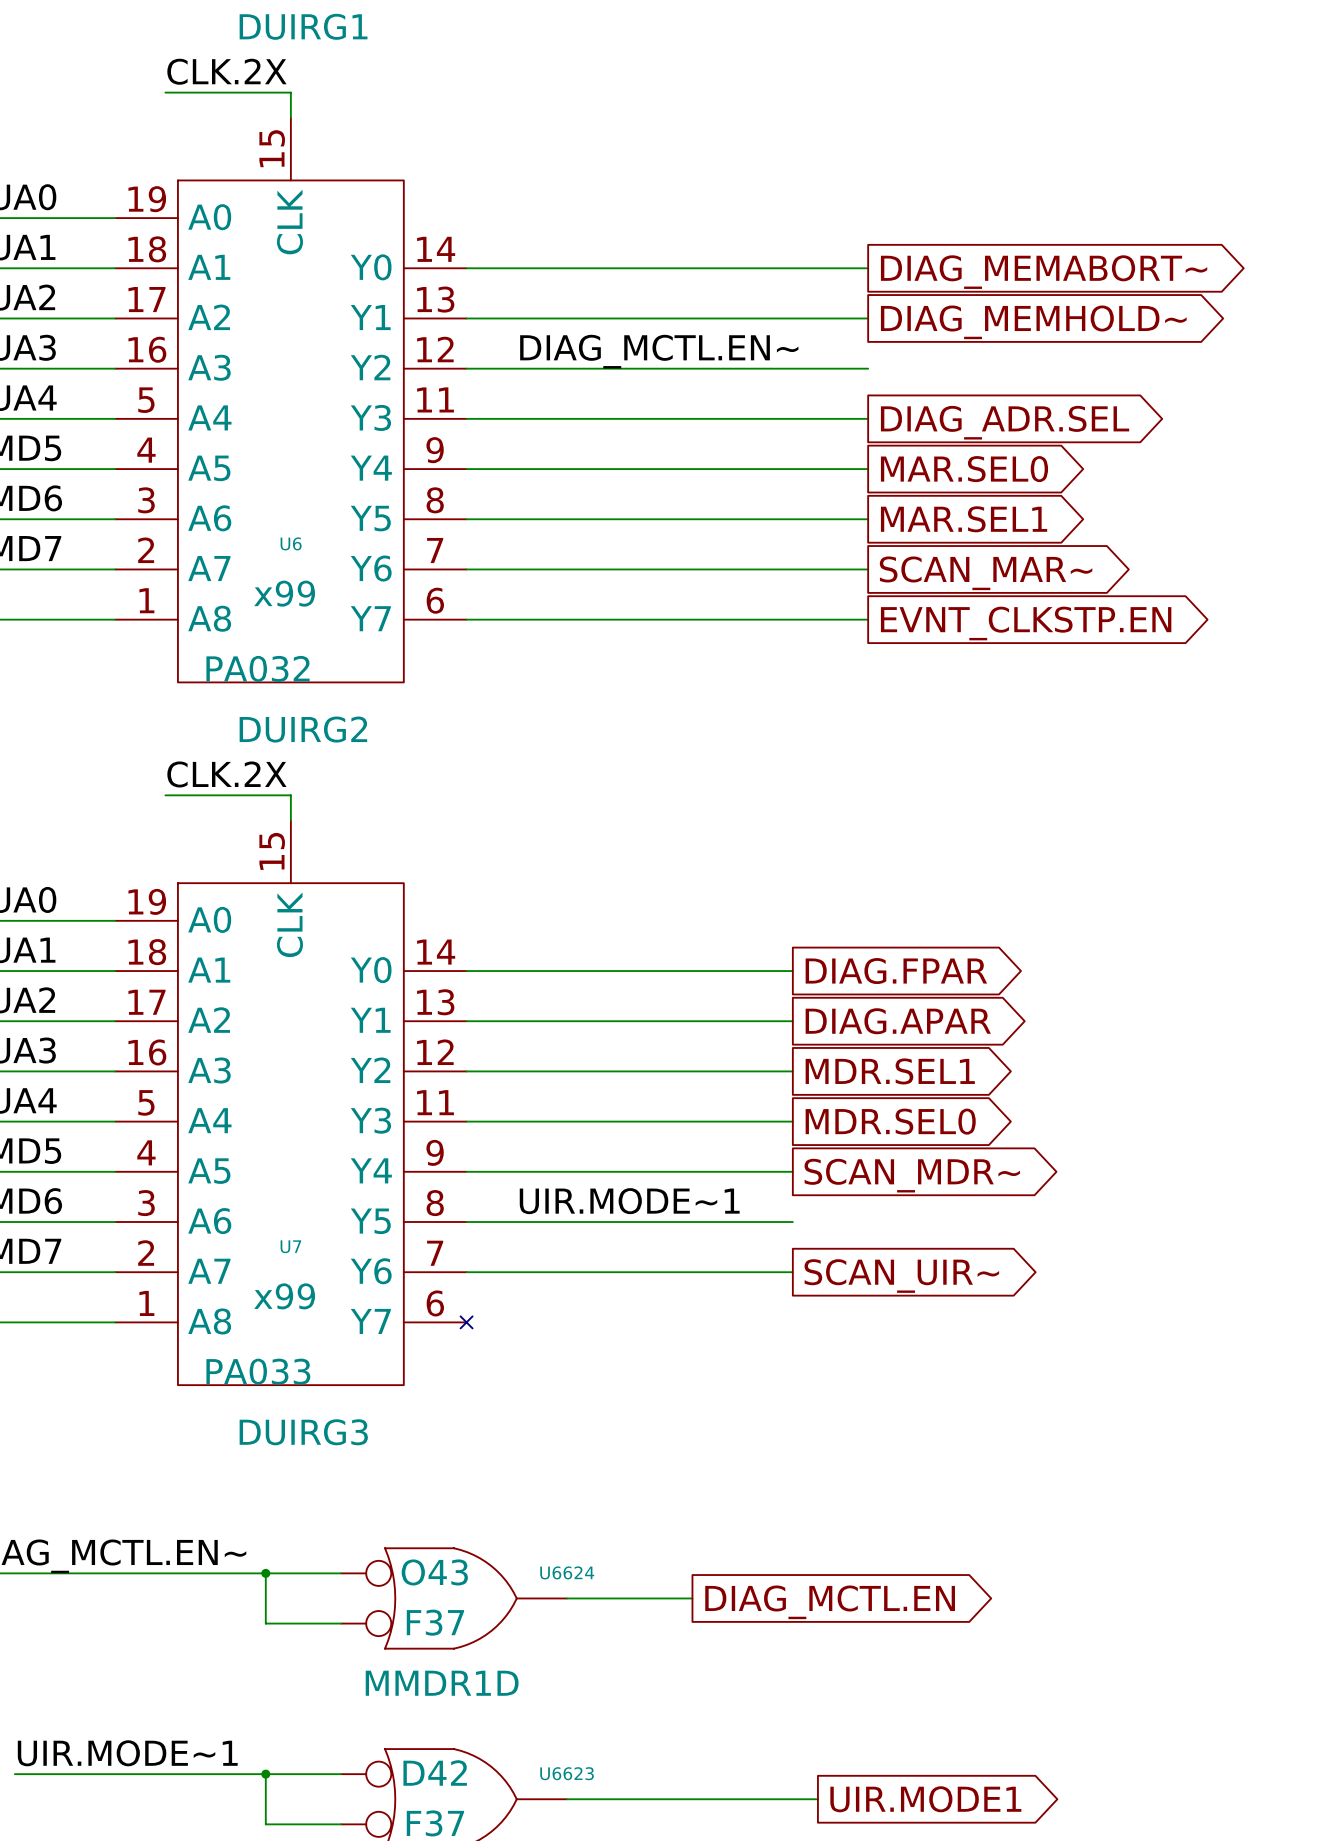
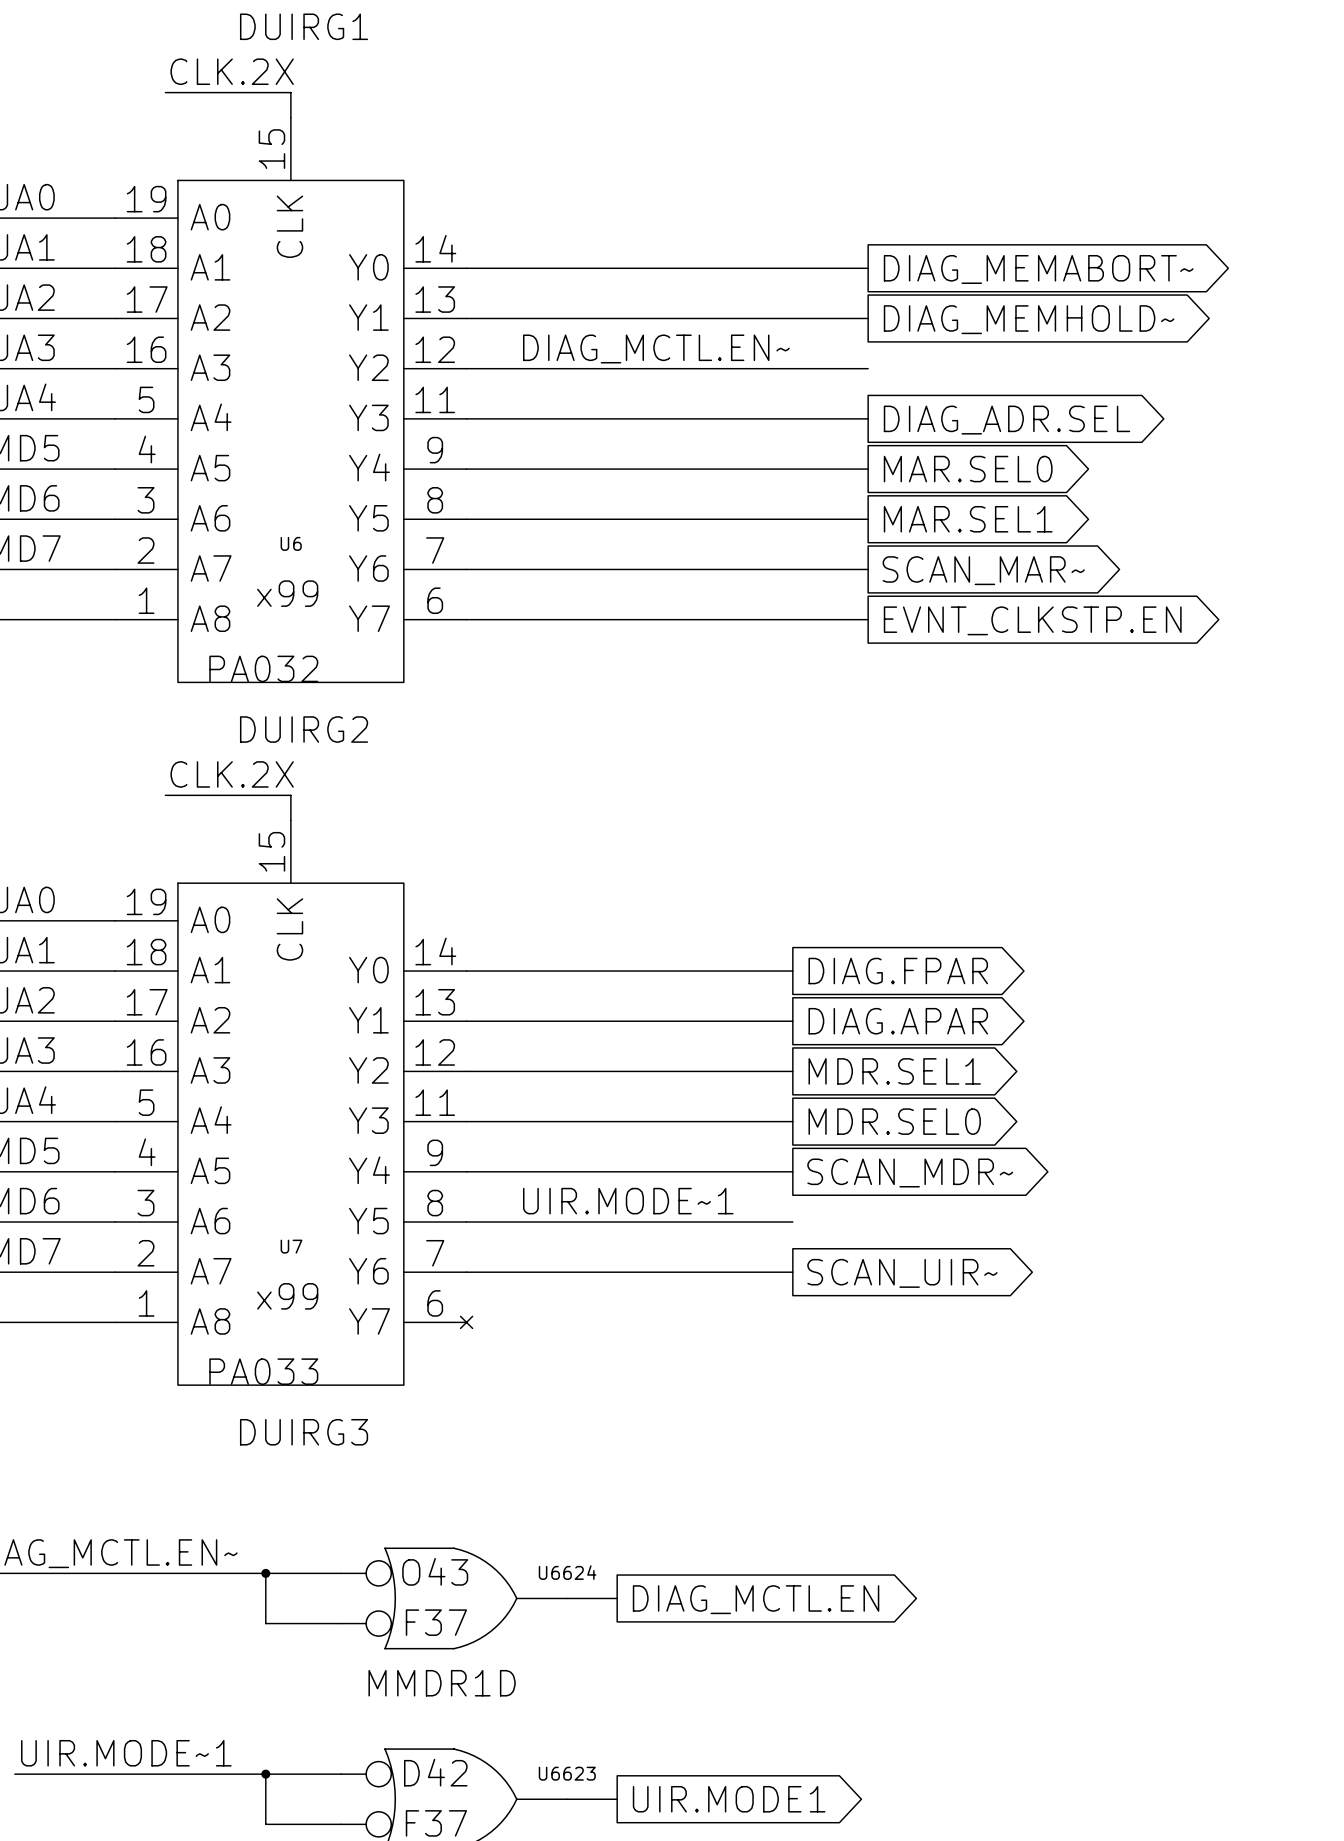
wire: (617, 1598) (692, 1598) -> none
global label position: DIAG_MCTL.EN (830, 1602) -> DIAG_MCTL.EN (756, 1599)
wire: (617, 1799) (817, 1799) -> none
global label position: UIR.MODE1 (925, 1799) -> UIR.MODE1 (729, 1799)

